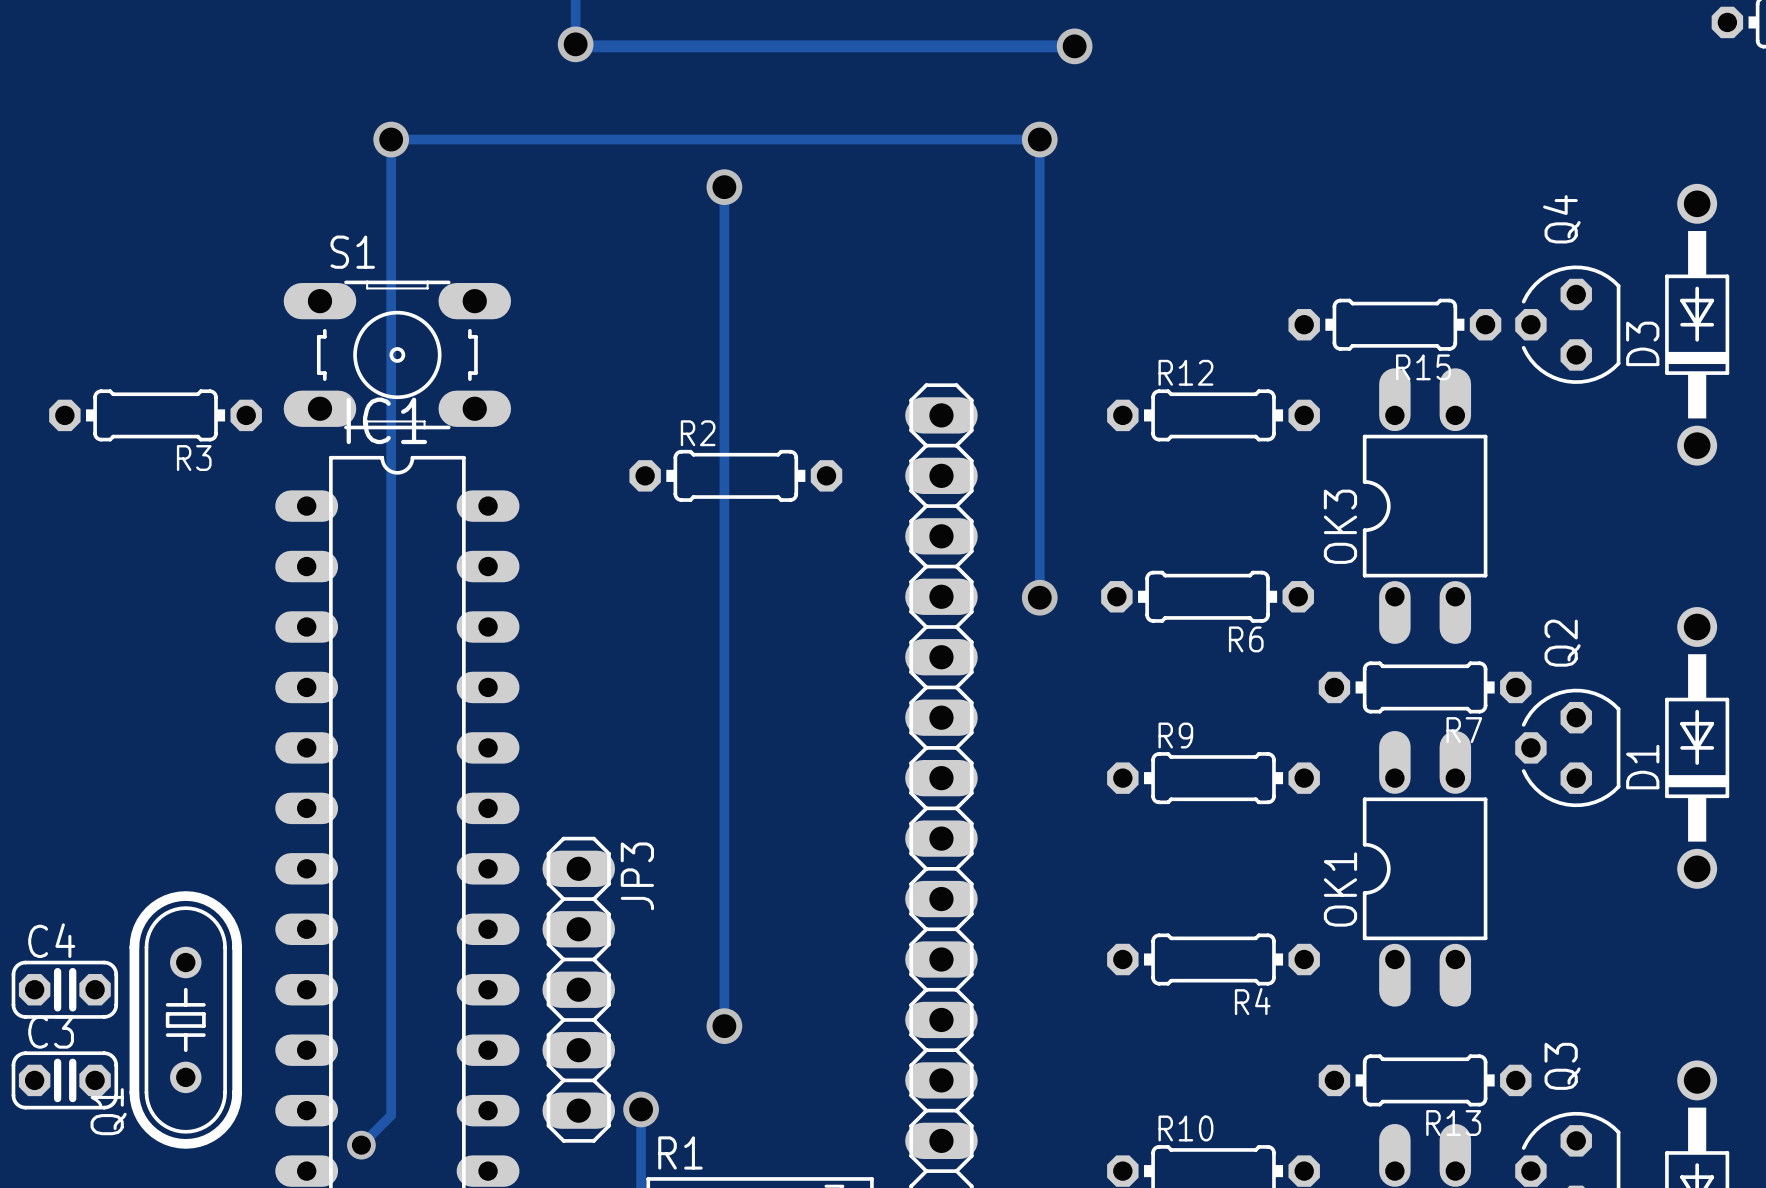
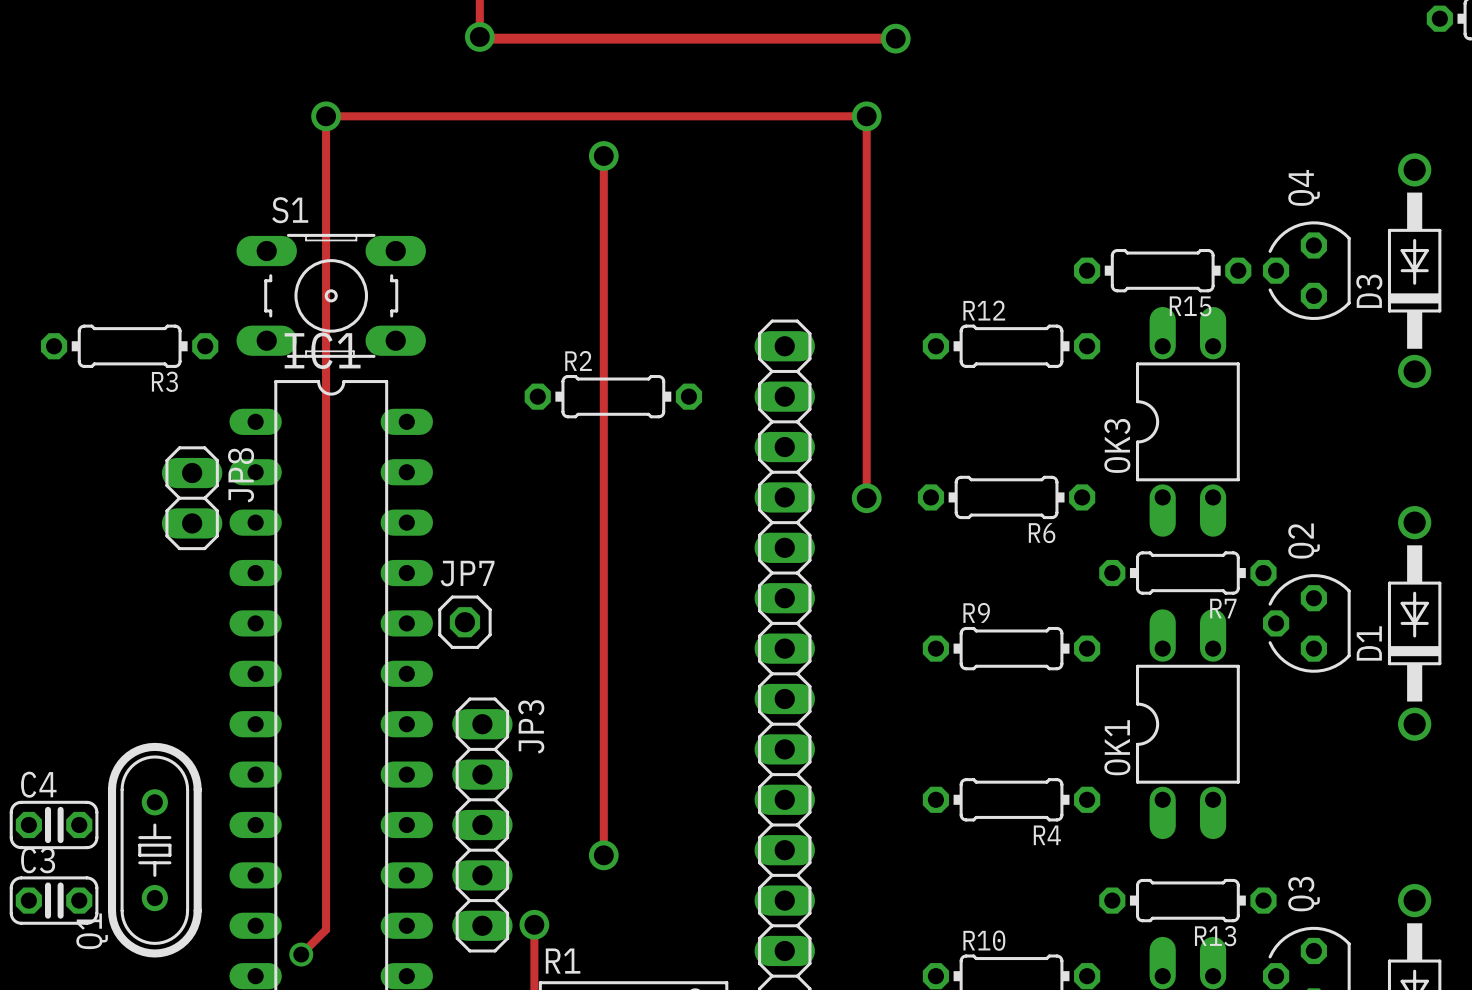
JP8: none -> (192, 498)
JP7: none -> (464, 622)

